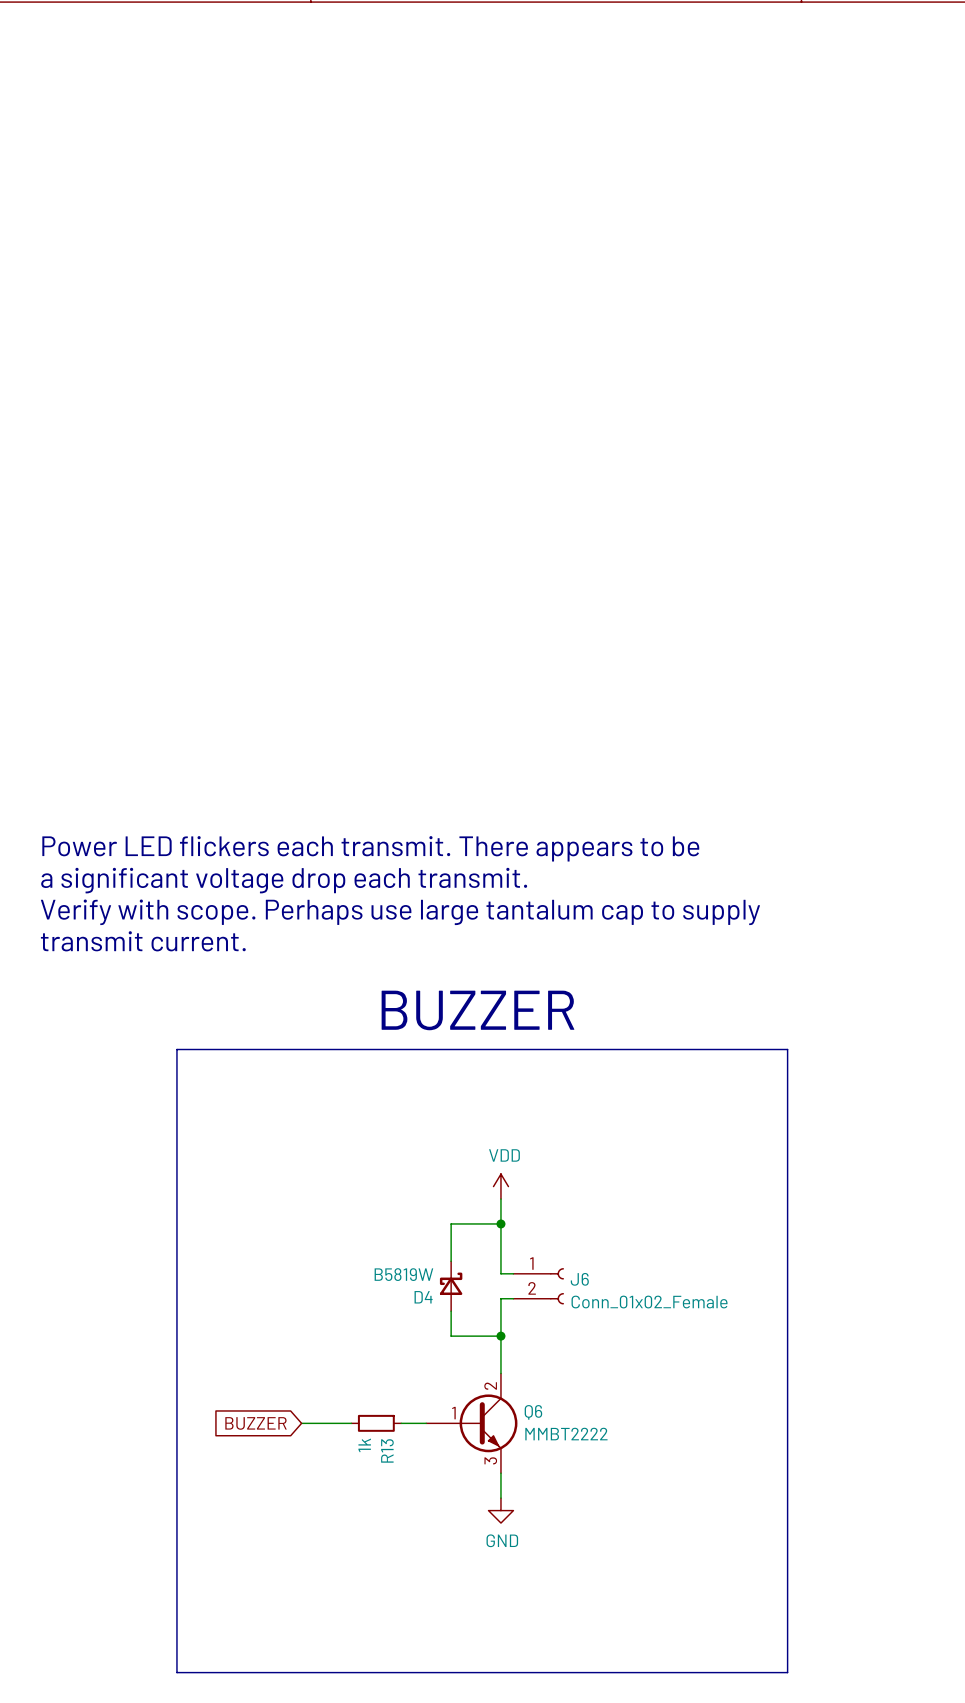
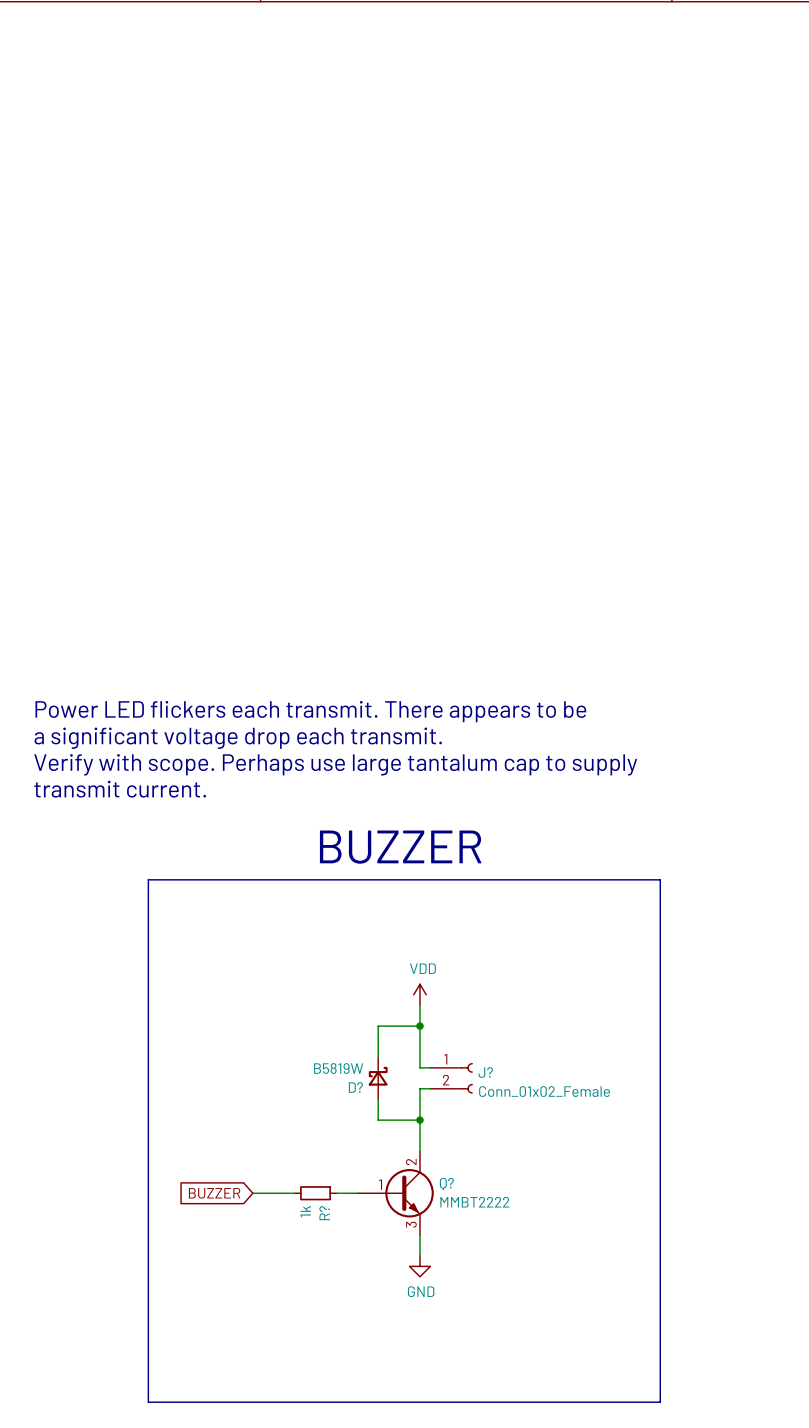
J6 name: J6 (579, 1279) -> J? (485, 1072)
D4 name: D4 (423, 1297) -> D? (355, 1087)
Q6 name: Q6 (533, 1412) -> Q? (446, 1184)
R13 name: R13 (387, 1450) -> R? (324, 1213)

